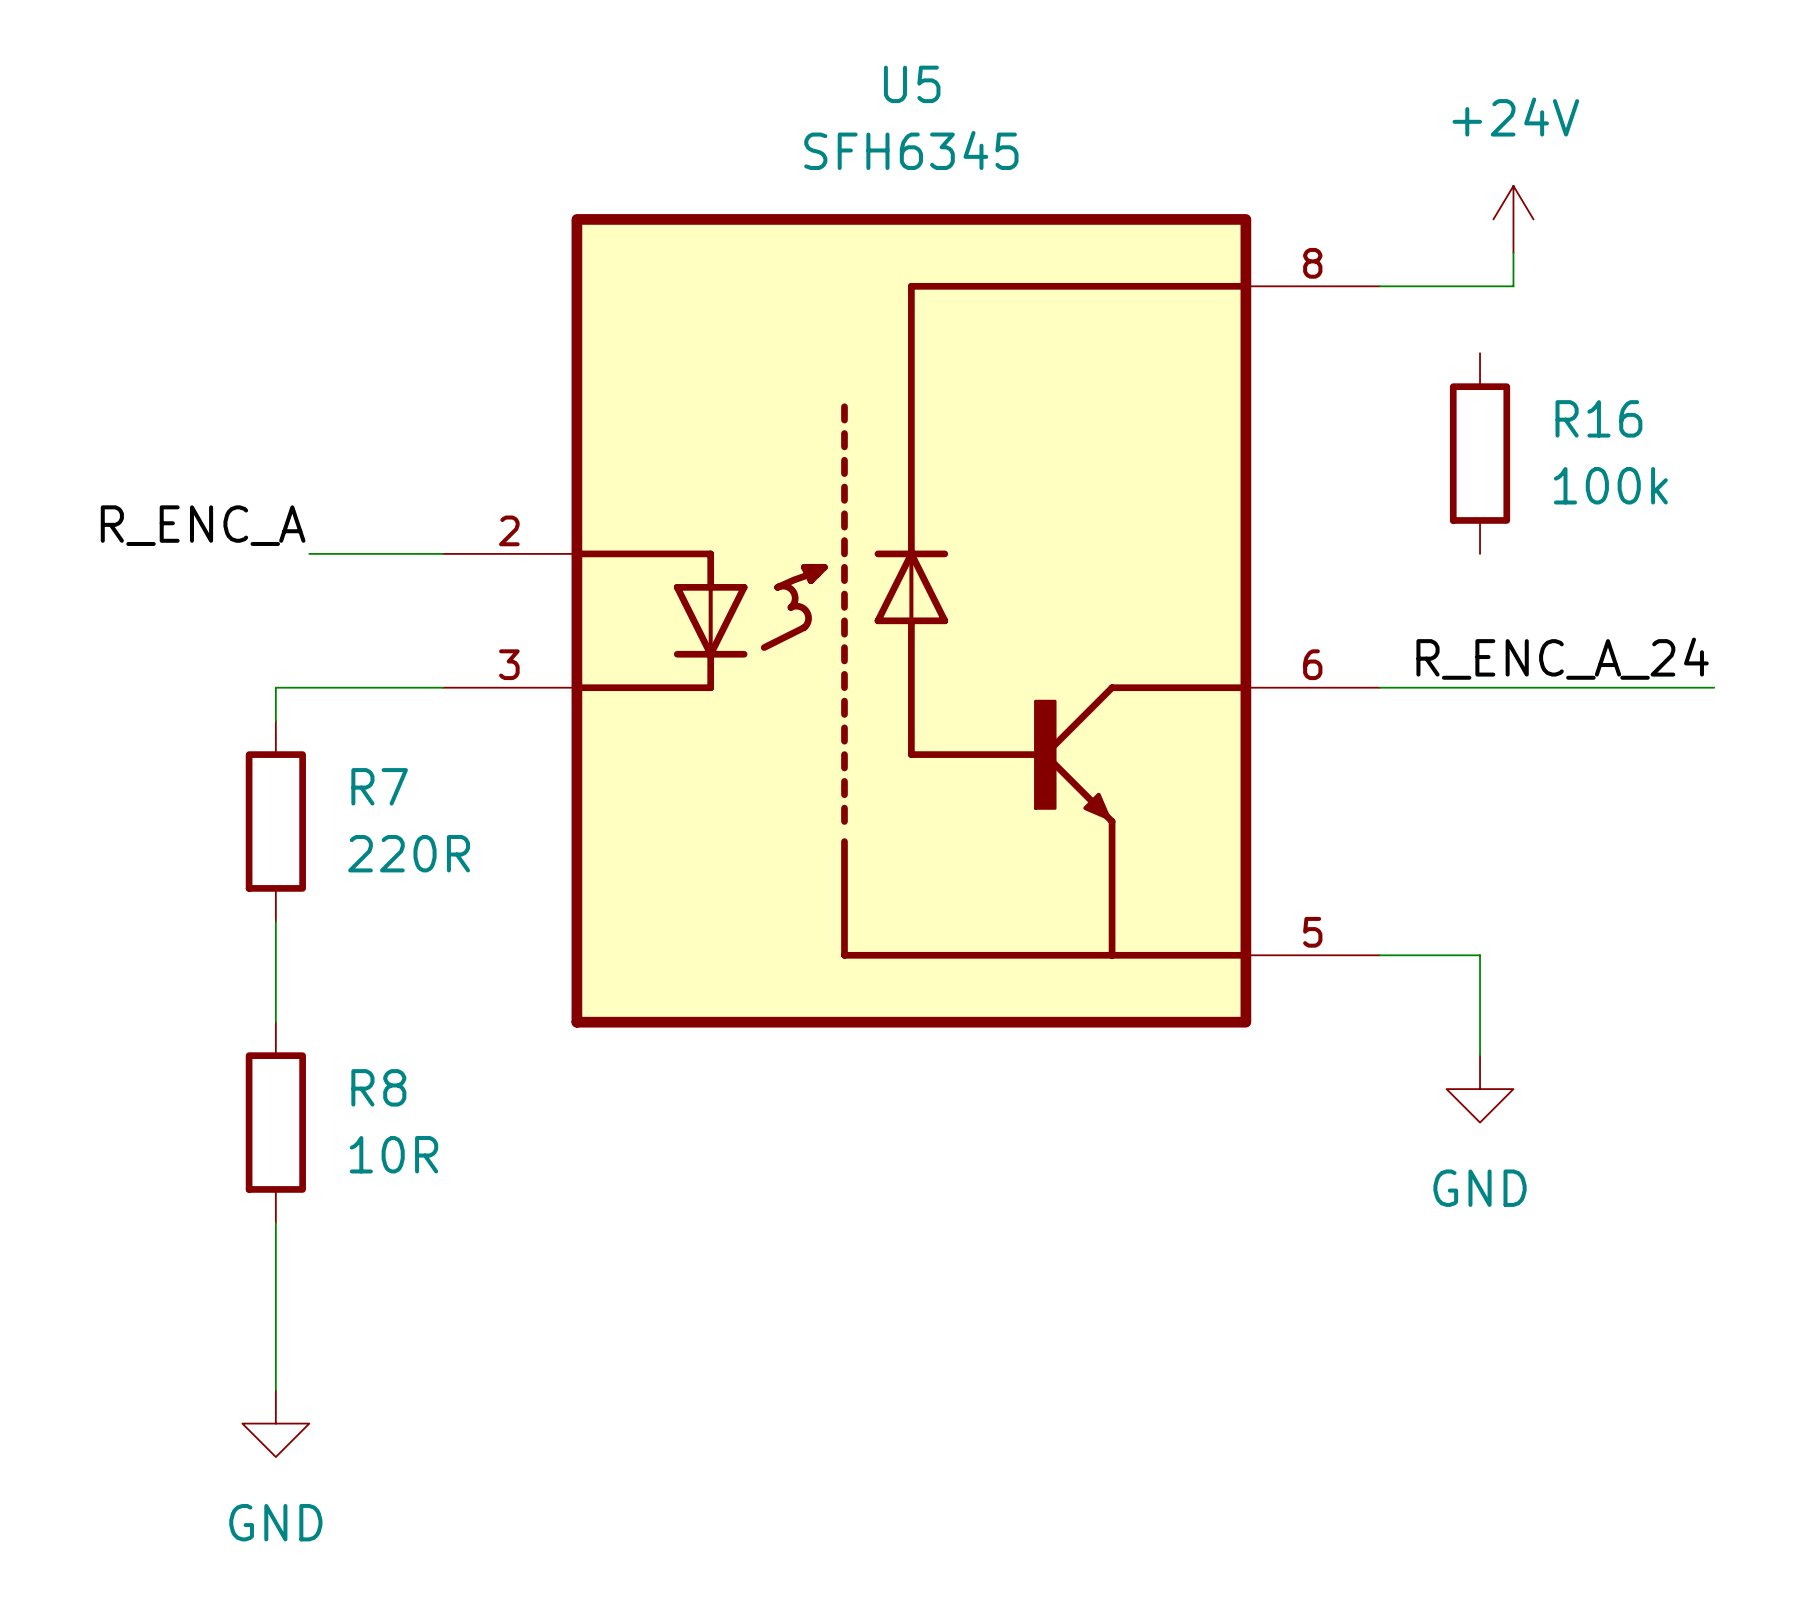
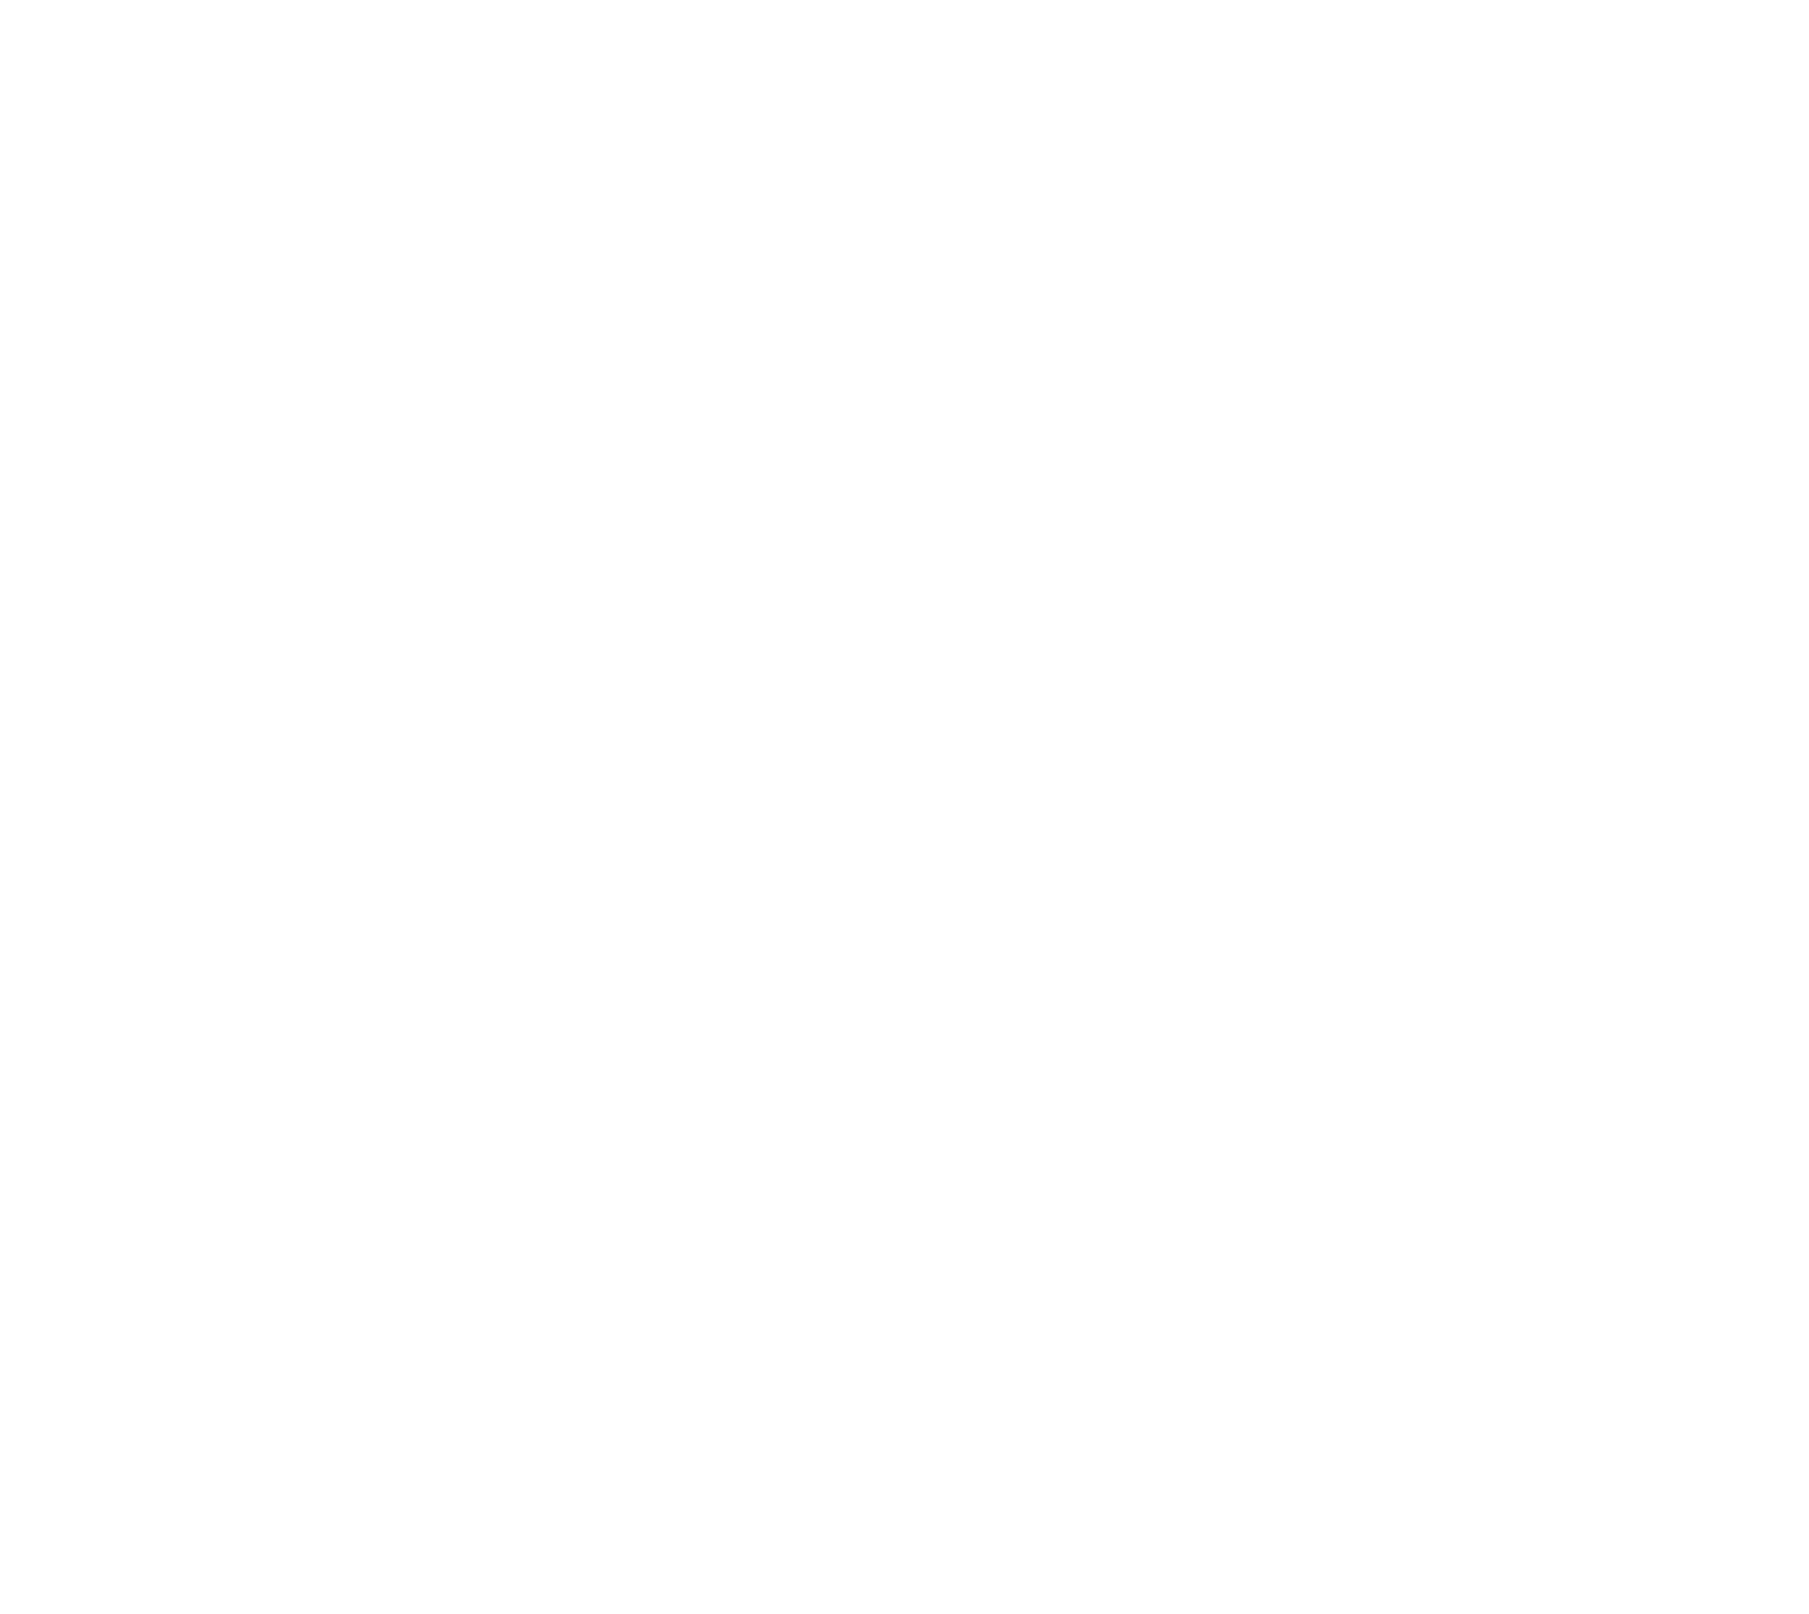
power symbol: +24V (1513, 219) -> none
wire: (1513, 252) (1513, 286) (1379, 286) -> none
R16: 100k (1480, 453) -> none
label: R_ENC_A (203, 525) -> none
wire: (309, 553) (443, 553) -> none
U5: SFH6345 (911, 620) -> none
label: R_ENC_A_24 (1562, 658) -> none
wire: (443, 687) (275, 687) (275, 721) -> none
wire: (1379, 687) (1714, 687) -> none
R7: 220R (275, 821) -> none
wire: (275, 921) (275, 1022) -> none
wire: (1379, 955) (1480, 955) (1480, 1055) -> none
power symbol: GND (1480, 1089) -> none
R8: 10R (275, 1122) -> none
wire: (275, 1222) (275, 1390) -> none
power symbol: GND (275, 1423) -> none

